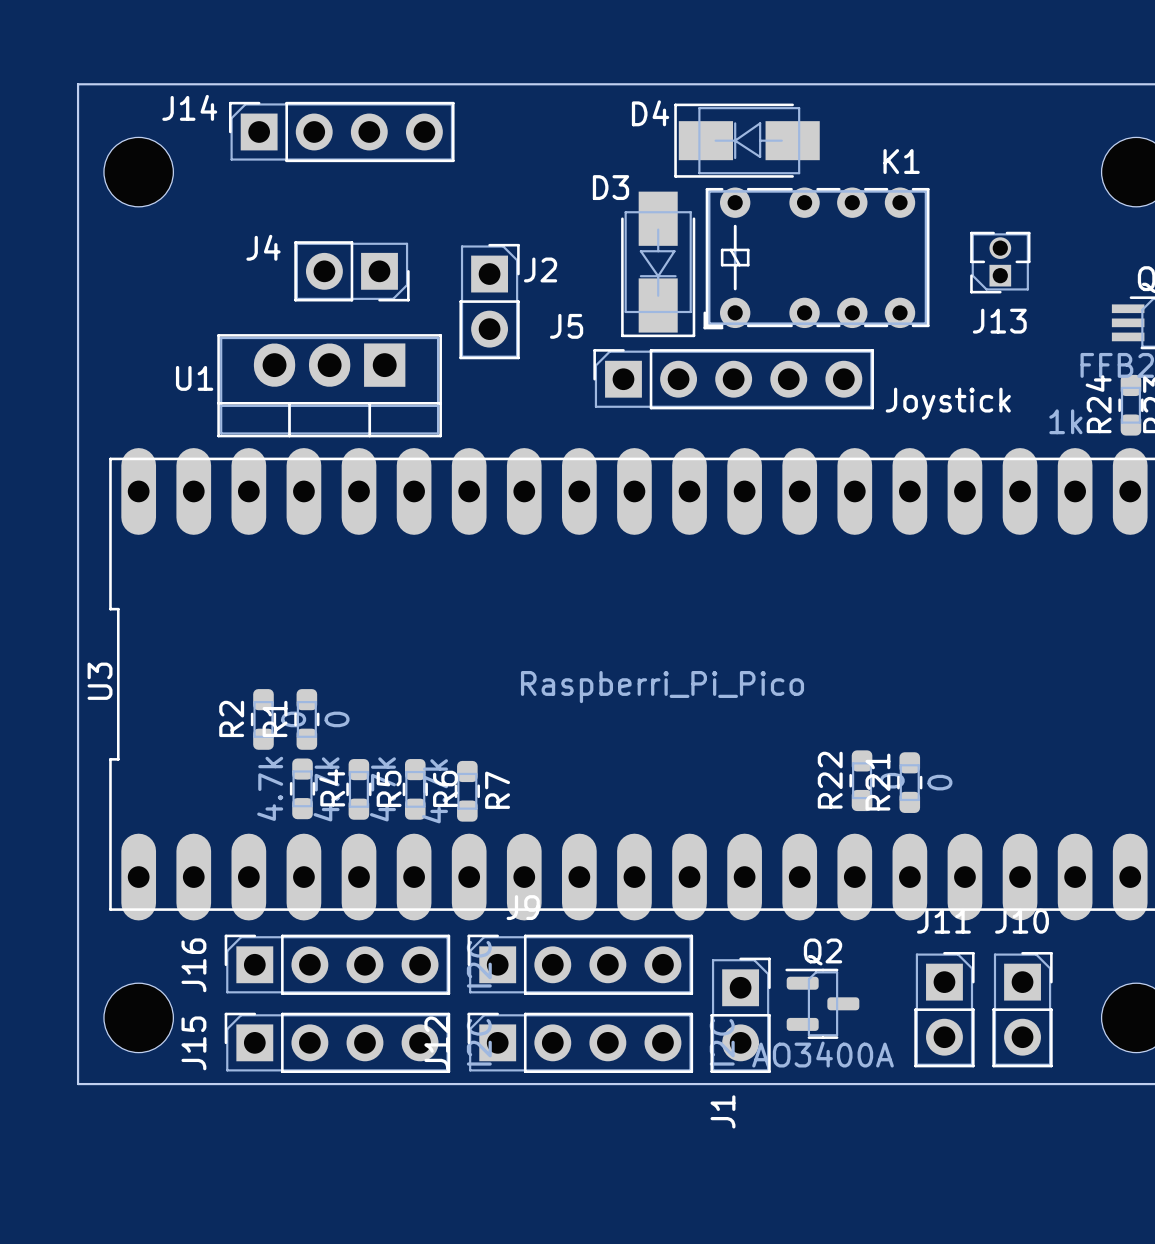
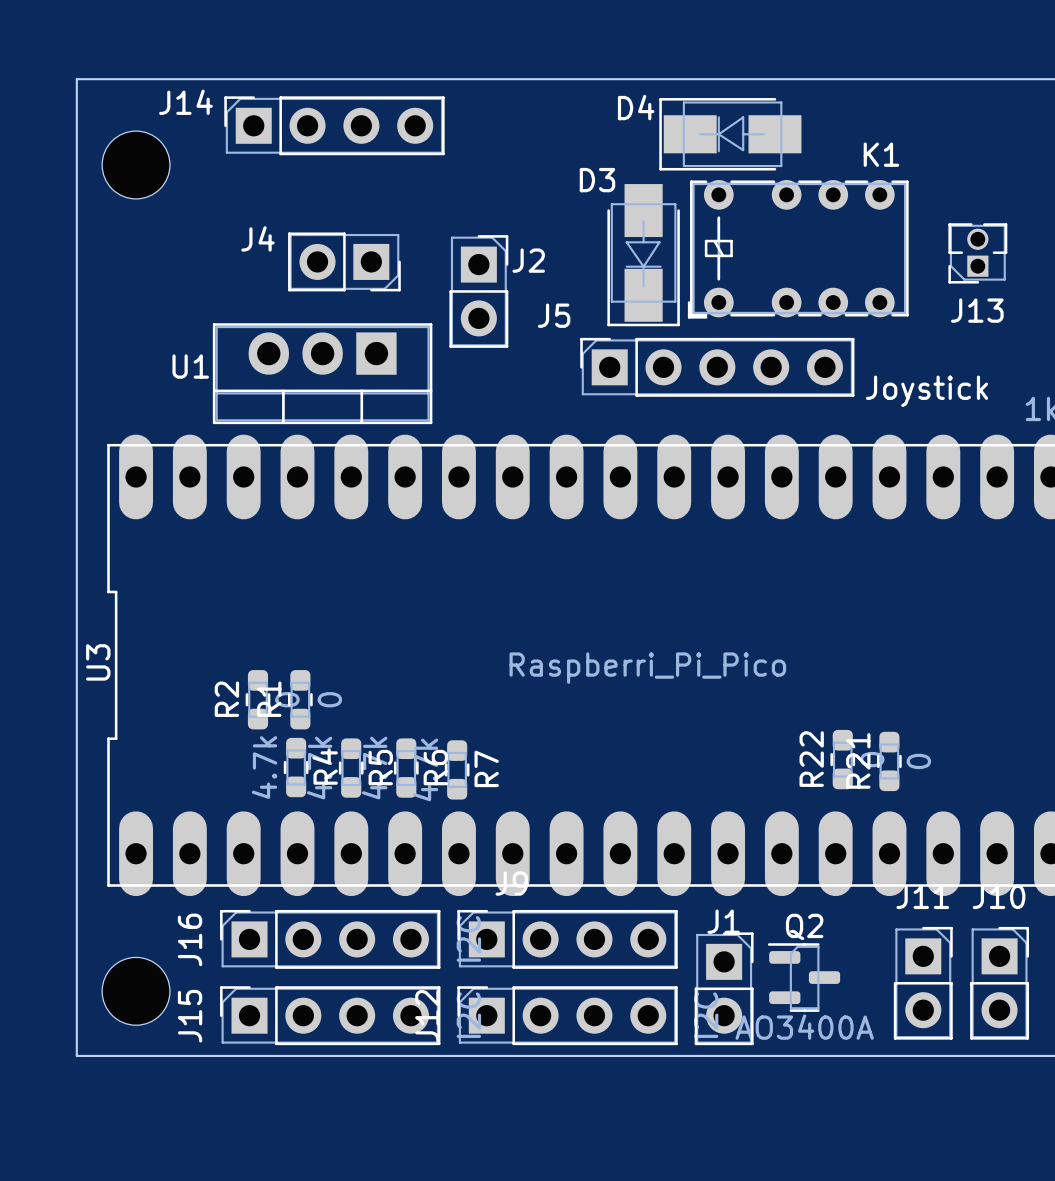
J1 name rotation: 0° (722, 1111) -> 90° clockwise (723, 921)
J1 name position: J1 (722, 1111) -> J1 (723, 921)

